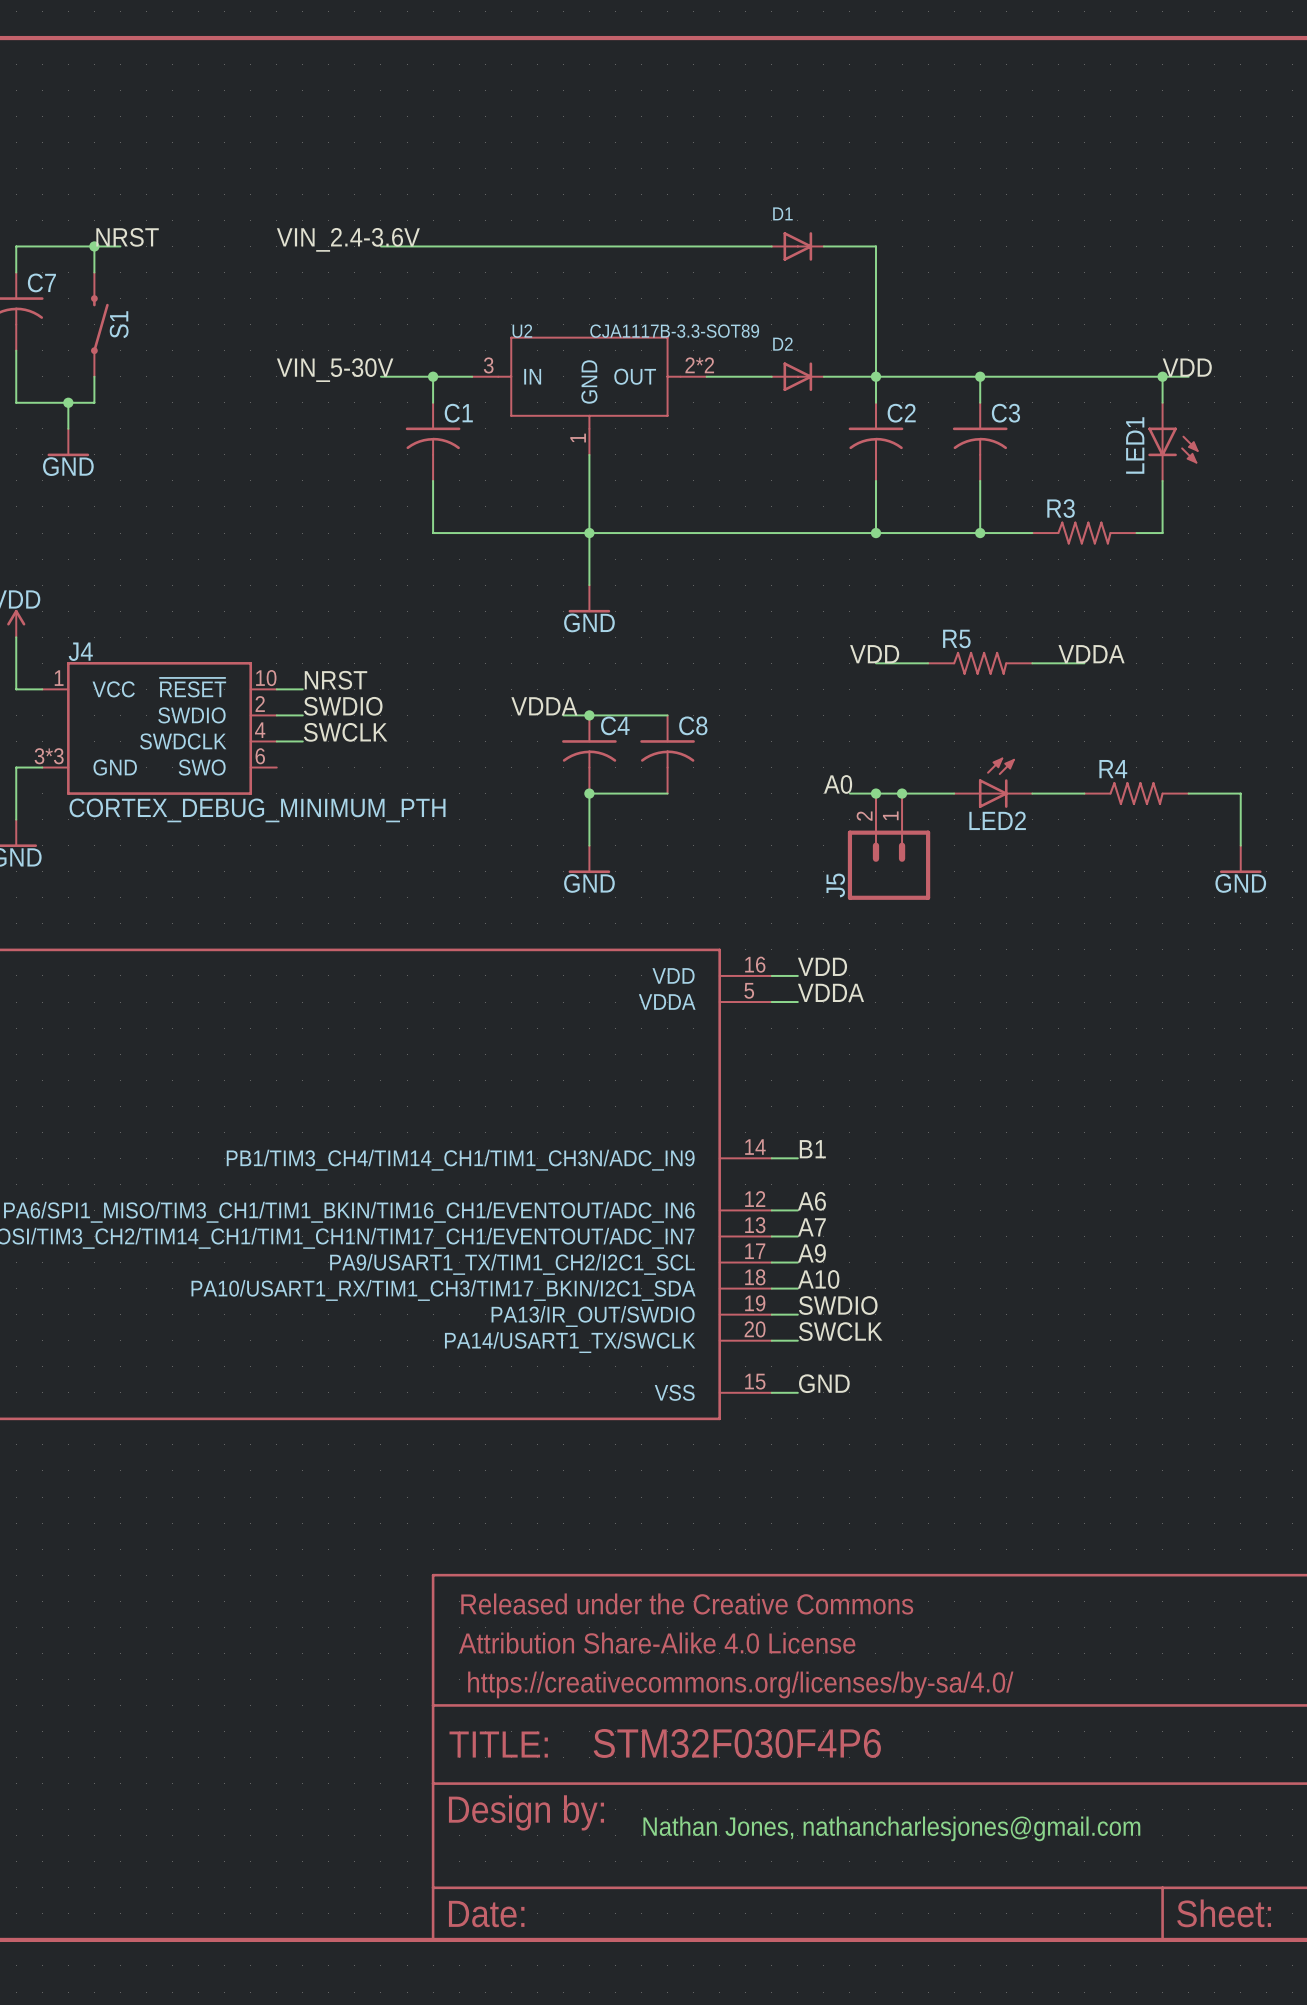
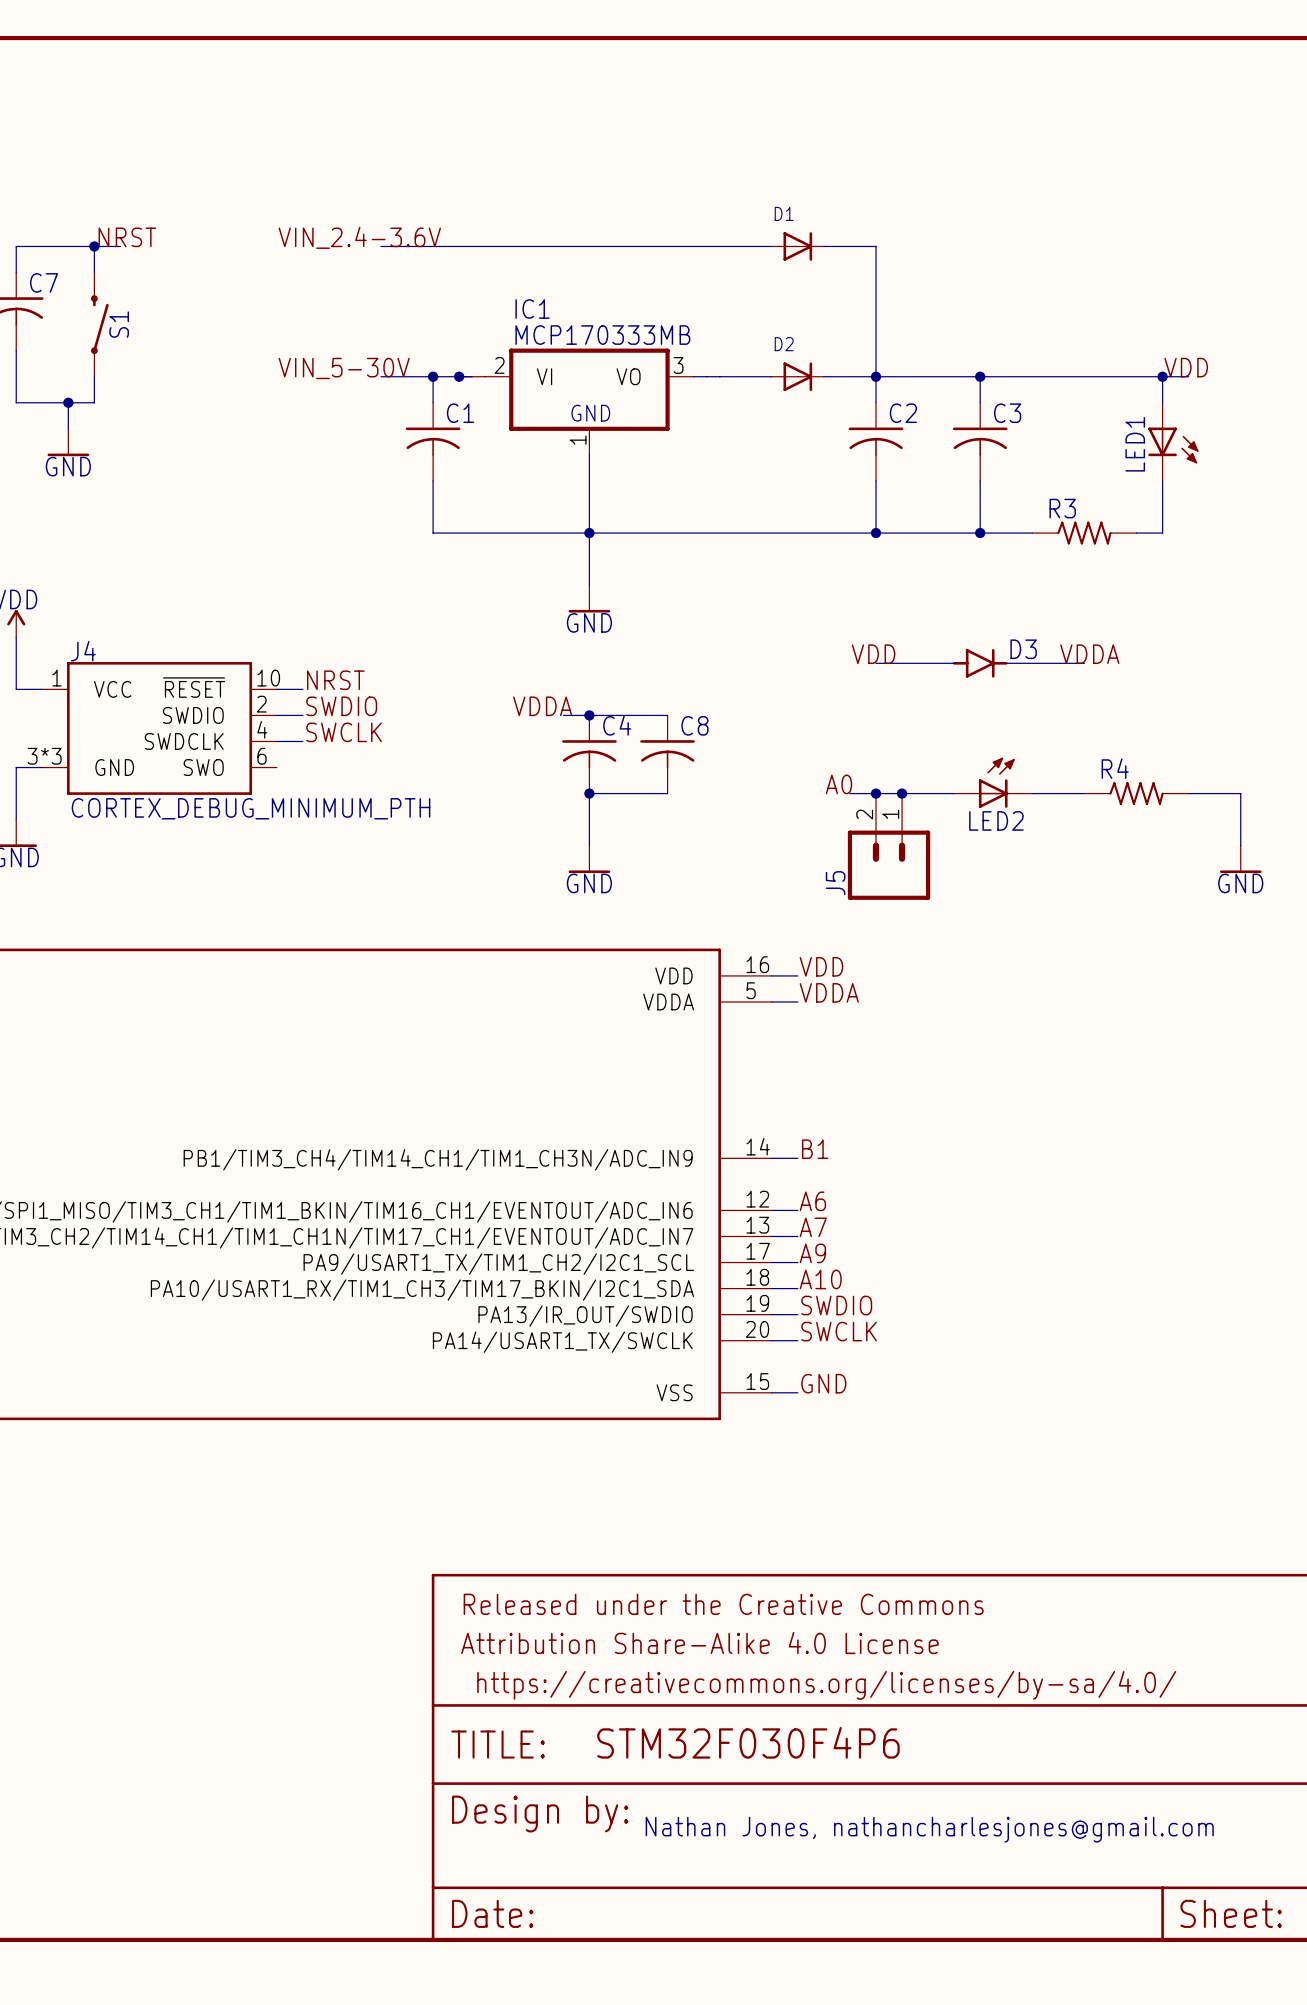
junction: none -> (459, 376)
U2: CJA1117B-3.3-SOT89 (589, 395) -> none
IC1: none -> MCP170333MB (576, 401)
R5: (980, 663) -> none
D3: none -> (980, 663)

